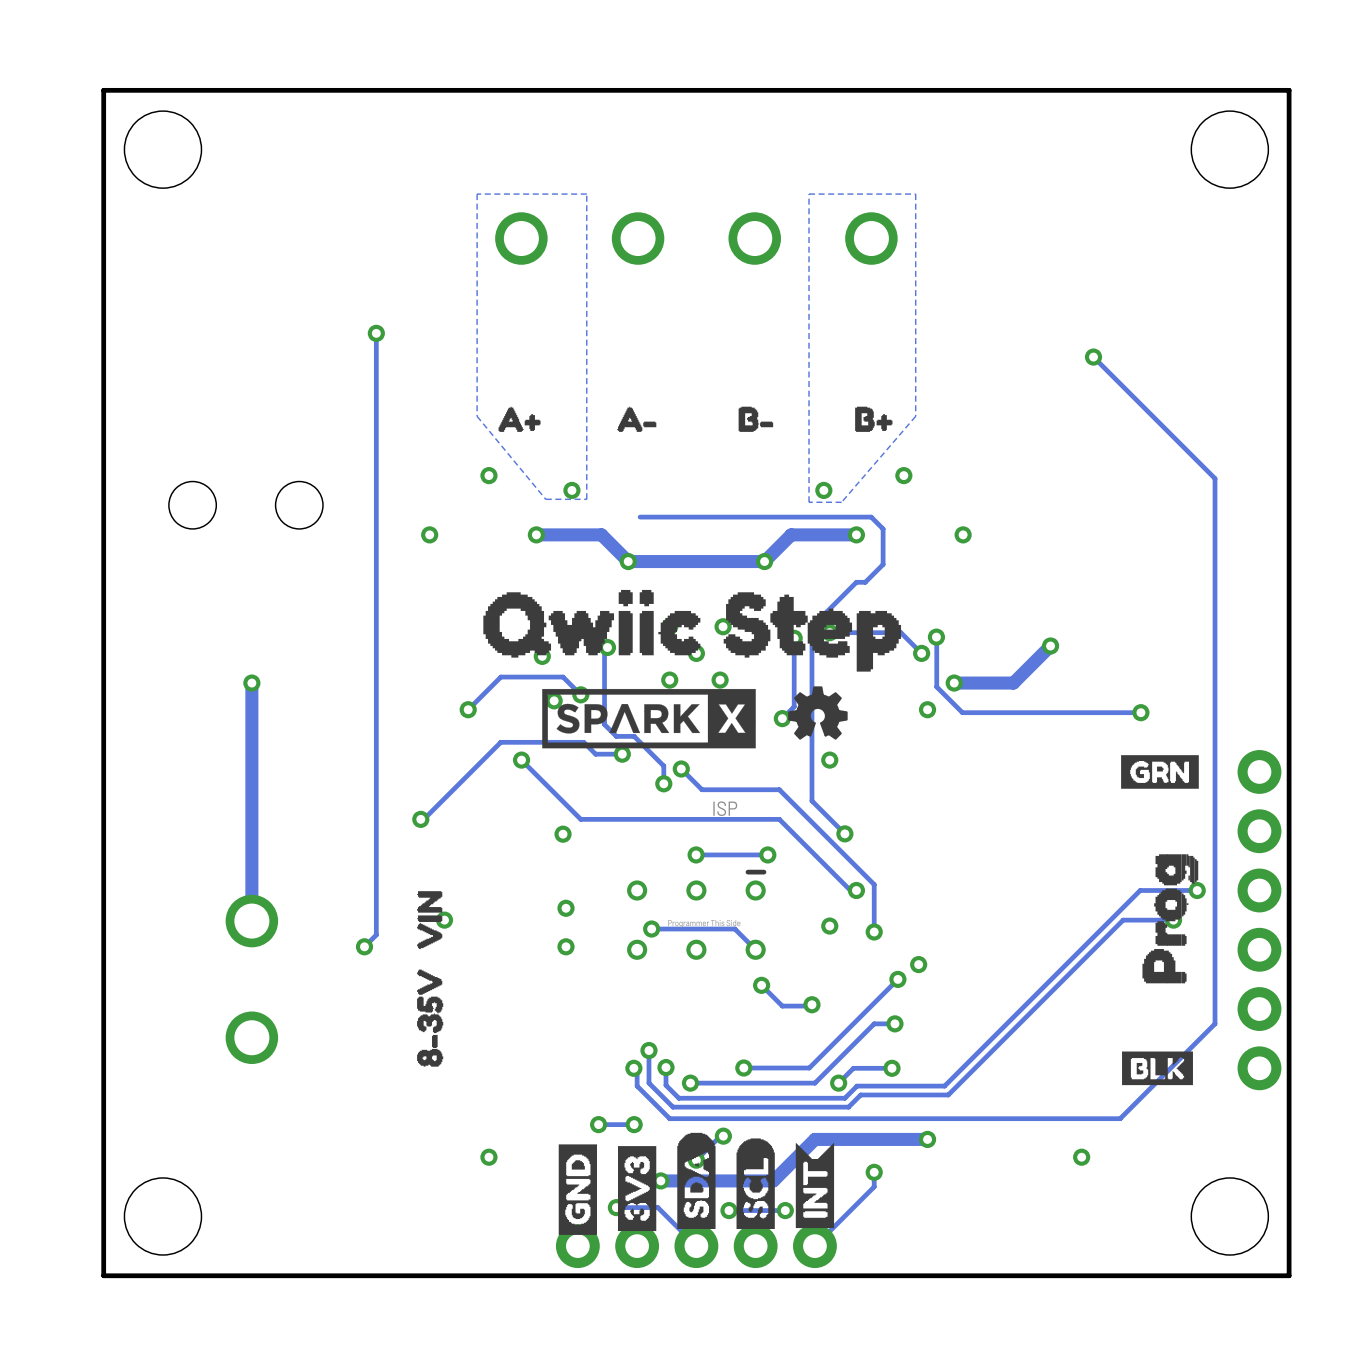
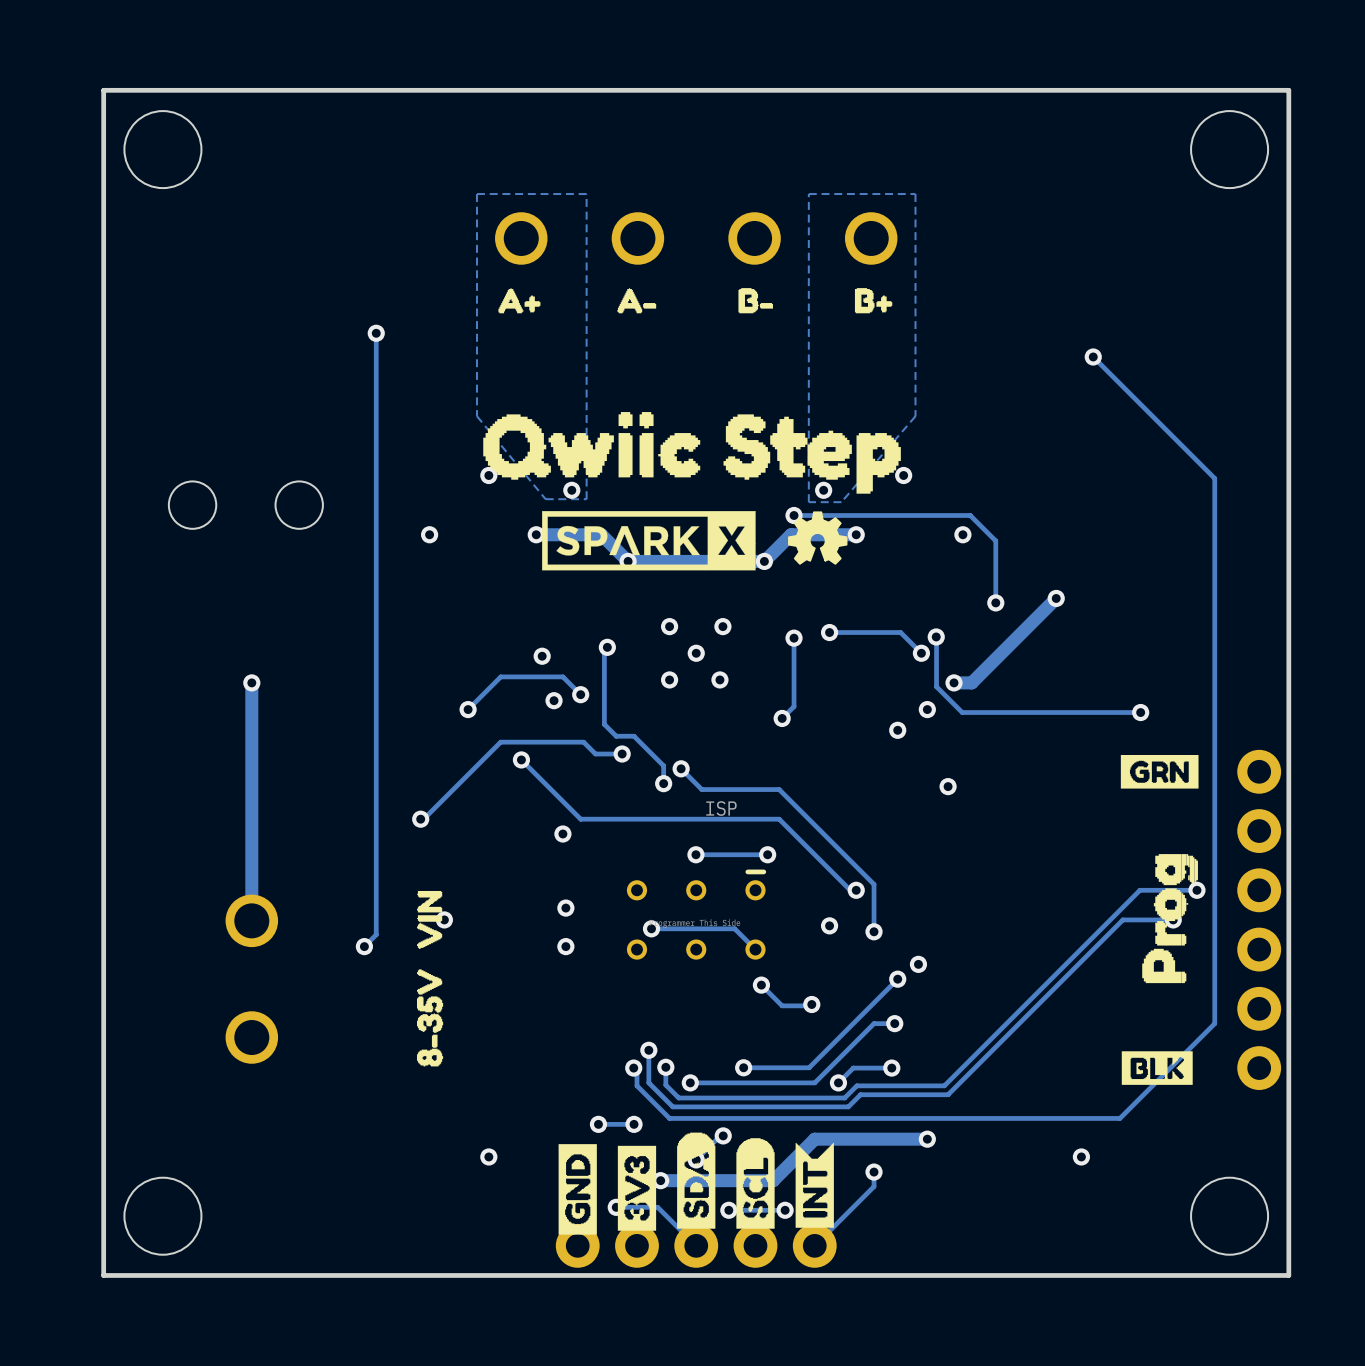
drawing position: (519, 419) -> (519, 300)
drawing position: (636, 419) -> (636, 300)
drawing position: (755, 419) -> (755, 300)
drawing position: (873, 419) -> (873, 300)
track: none -> (794, 515) (970, 515) (995, 540) (995, 602)
via: none -> (794, 515)
track: (640, 517) (871, 517) (883, 528) (883, 564) (865, 582) (856, 582) (811, 626) (811, 800) (844, 833) -> none
via: none -> (1056, 598)
via: none -> (995, 602)
drawing position: (692, 630) -> (692, 452)
track: (1052, 644) (1013, 683) (972, 683) -> (1057, 596) (971, 682)
via: (1050, 646) -> none
drawing position: (817, 713) -> (817, 538)
drawing position: (648, 718) -> (648, 540)
via: none -> (897, 730)
via: (829, 760) -> none
via: none -> (948, 786)
via: (844, 833) -> none

